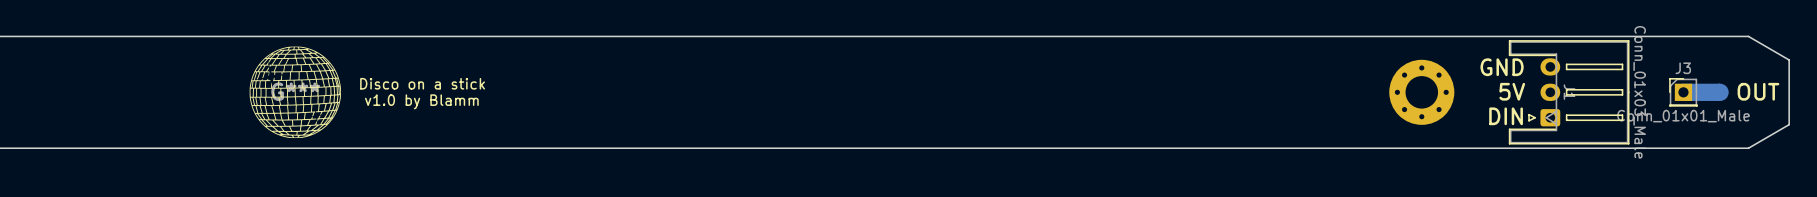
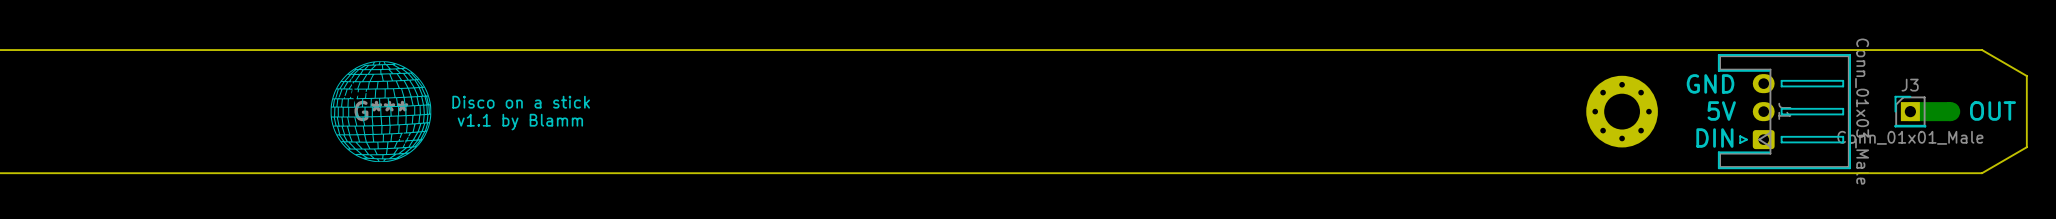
text: v1.0 by Blamm (421, 101) -> v1.1 by Blamm (520, 122)

